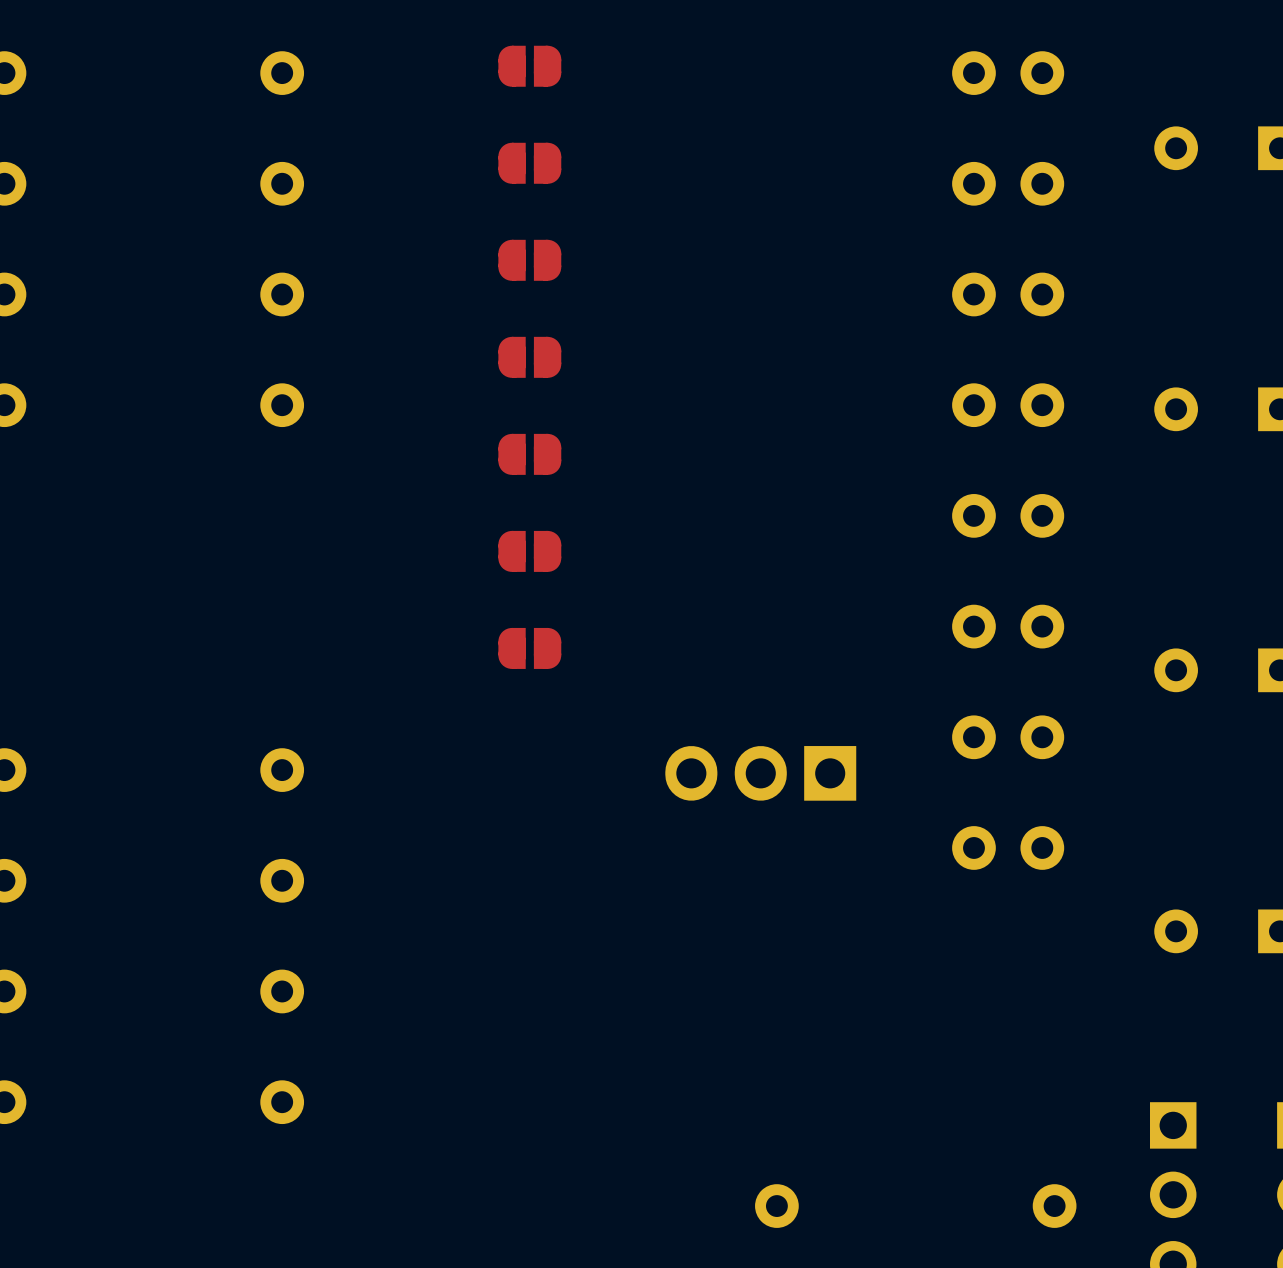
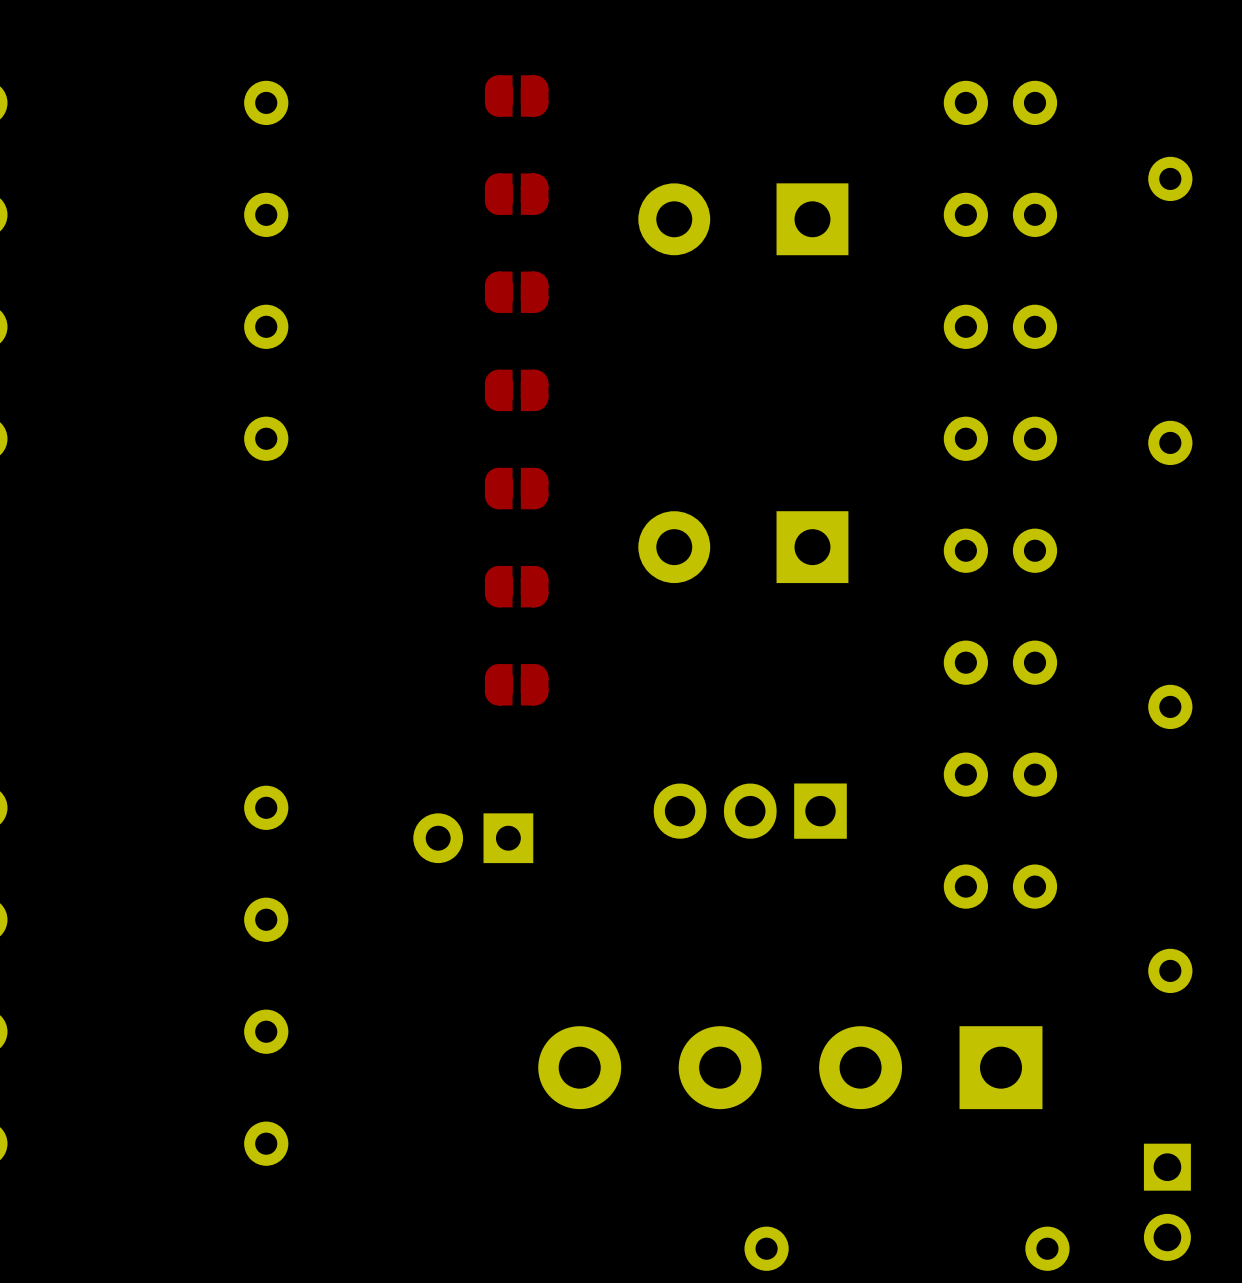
part: none -> (743, 219)
part: none -> (743, 547)
part: none -> (473, 838)
part: none -> (790, 1067)

